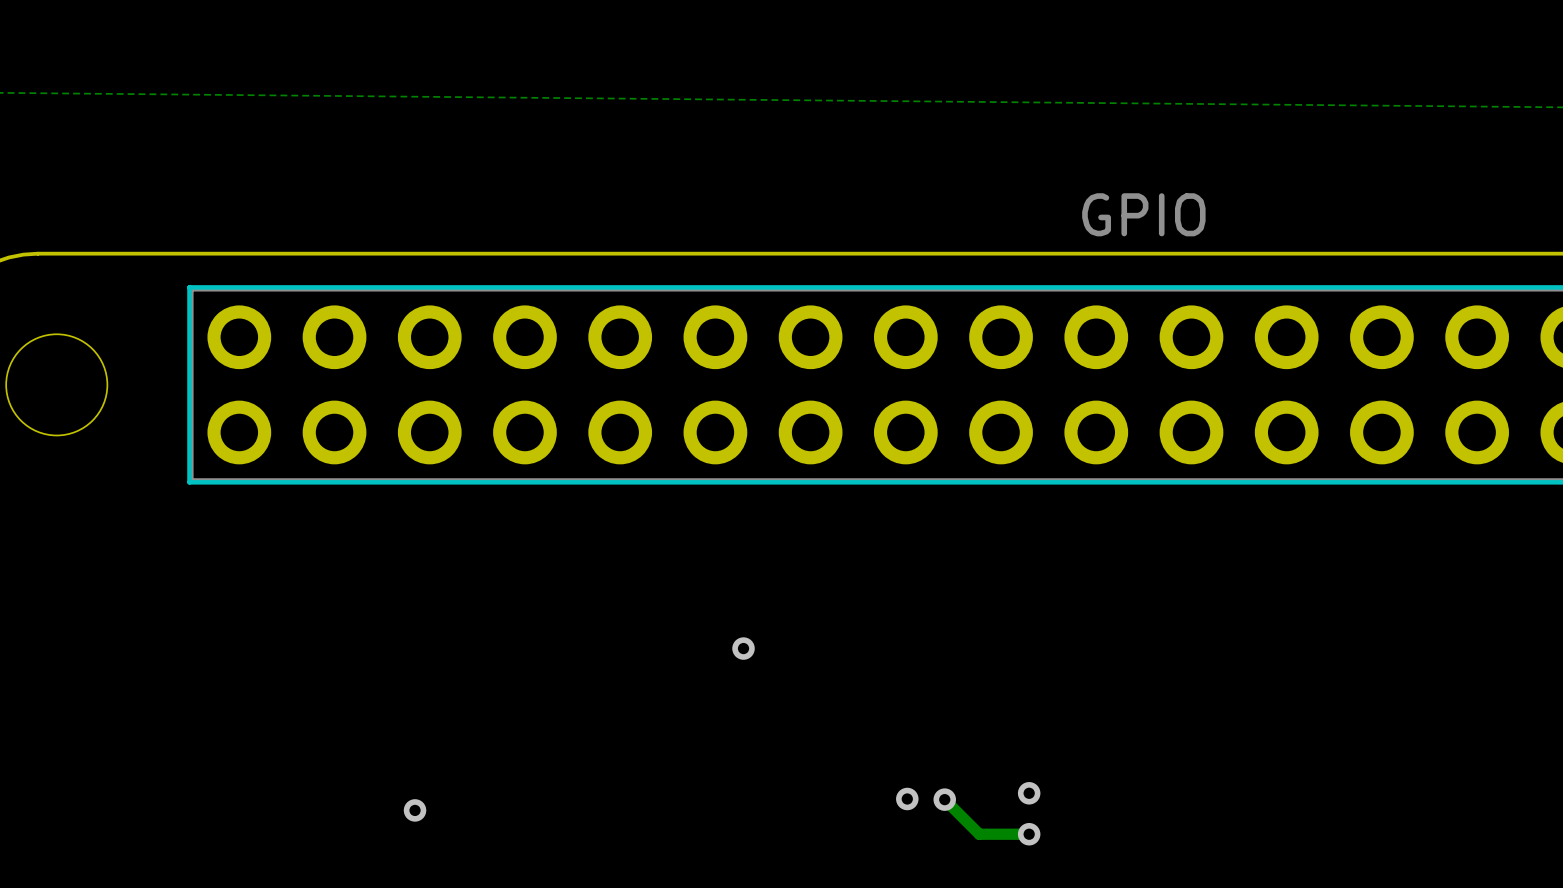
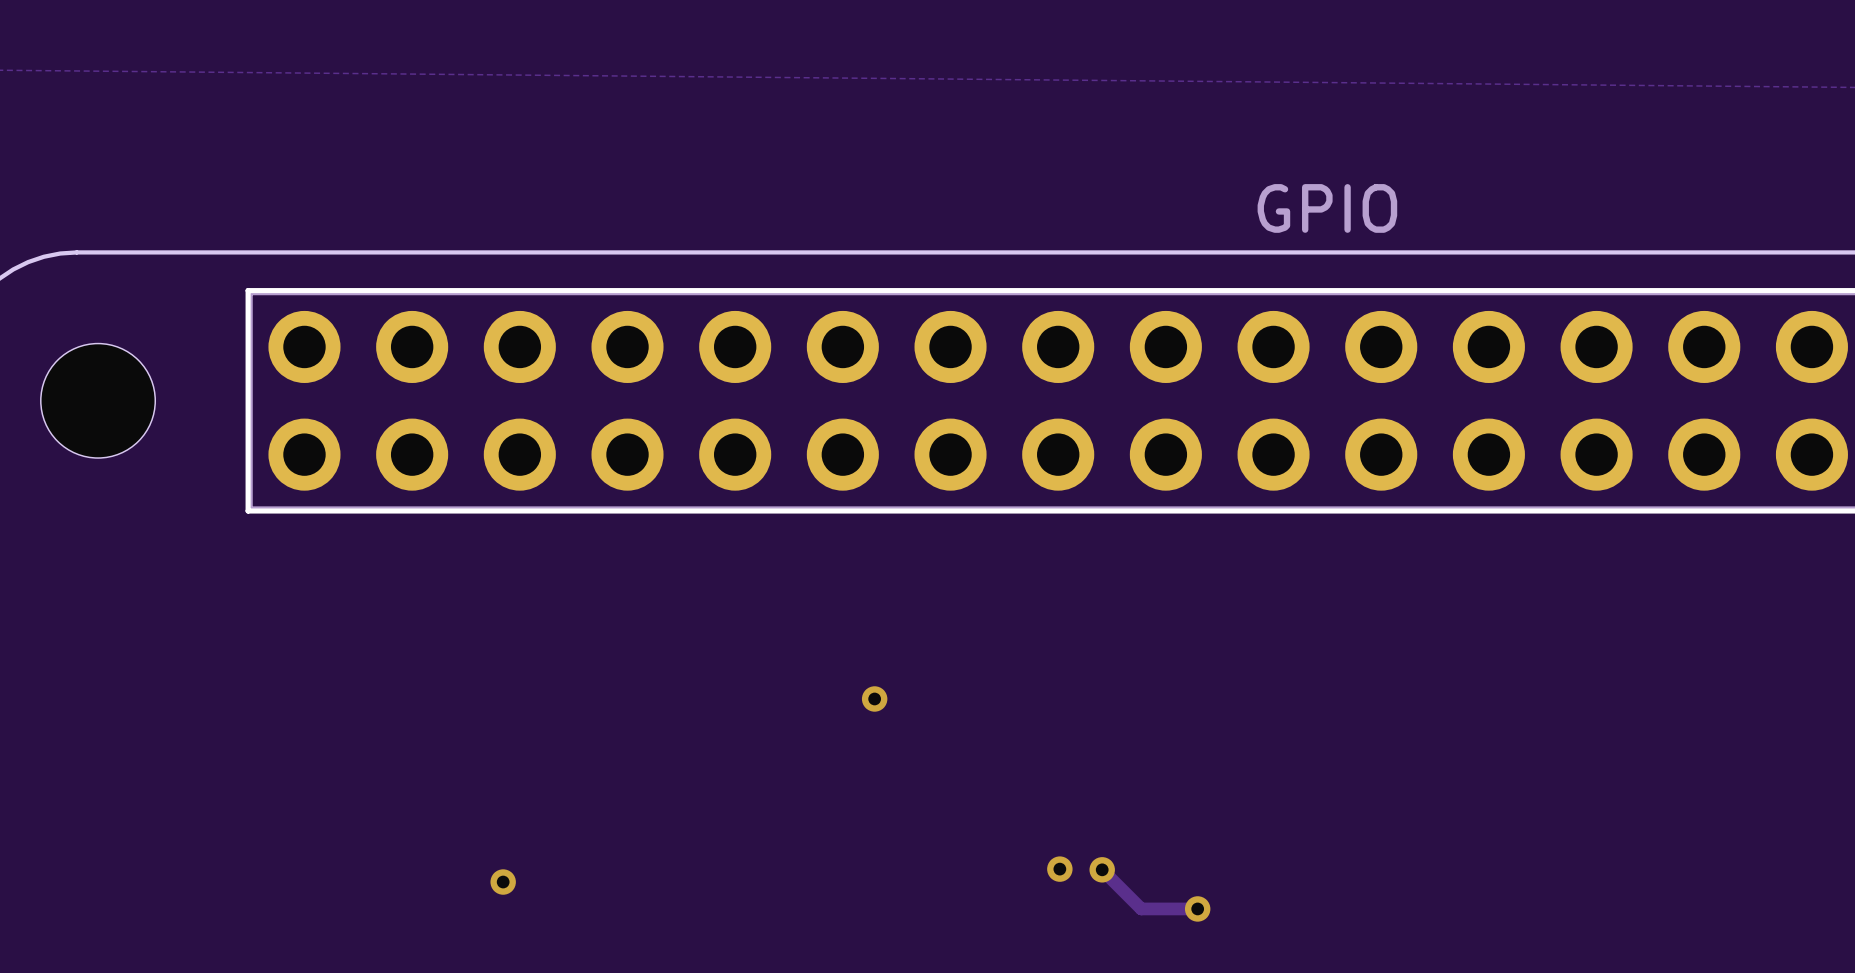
via: (1029, 793) -> none

